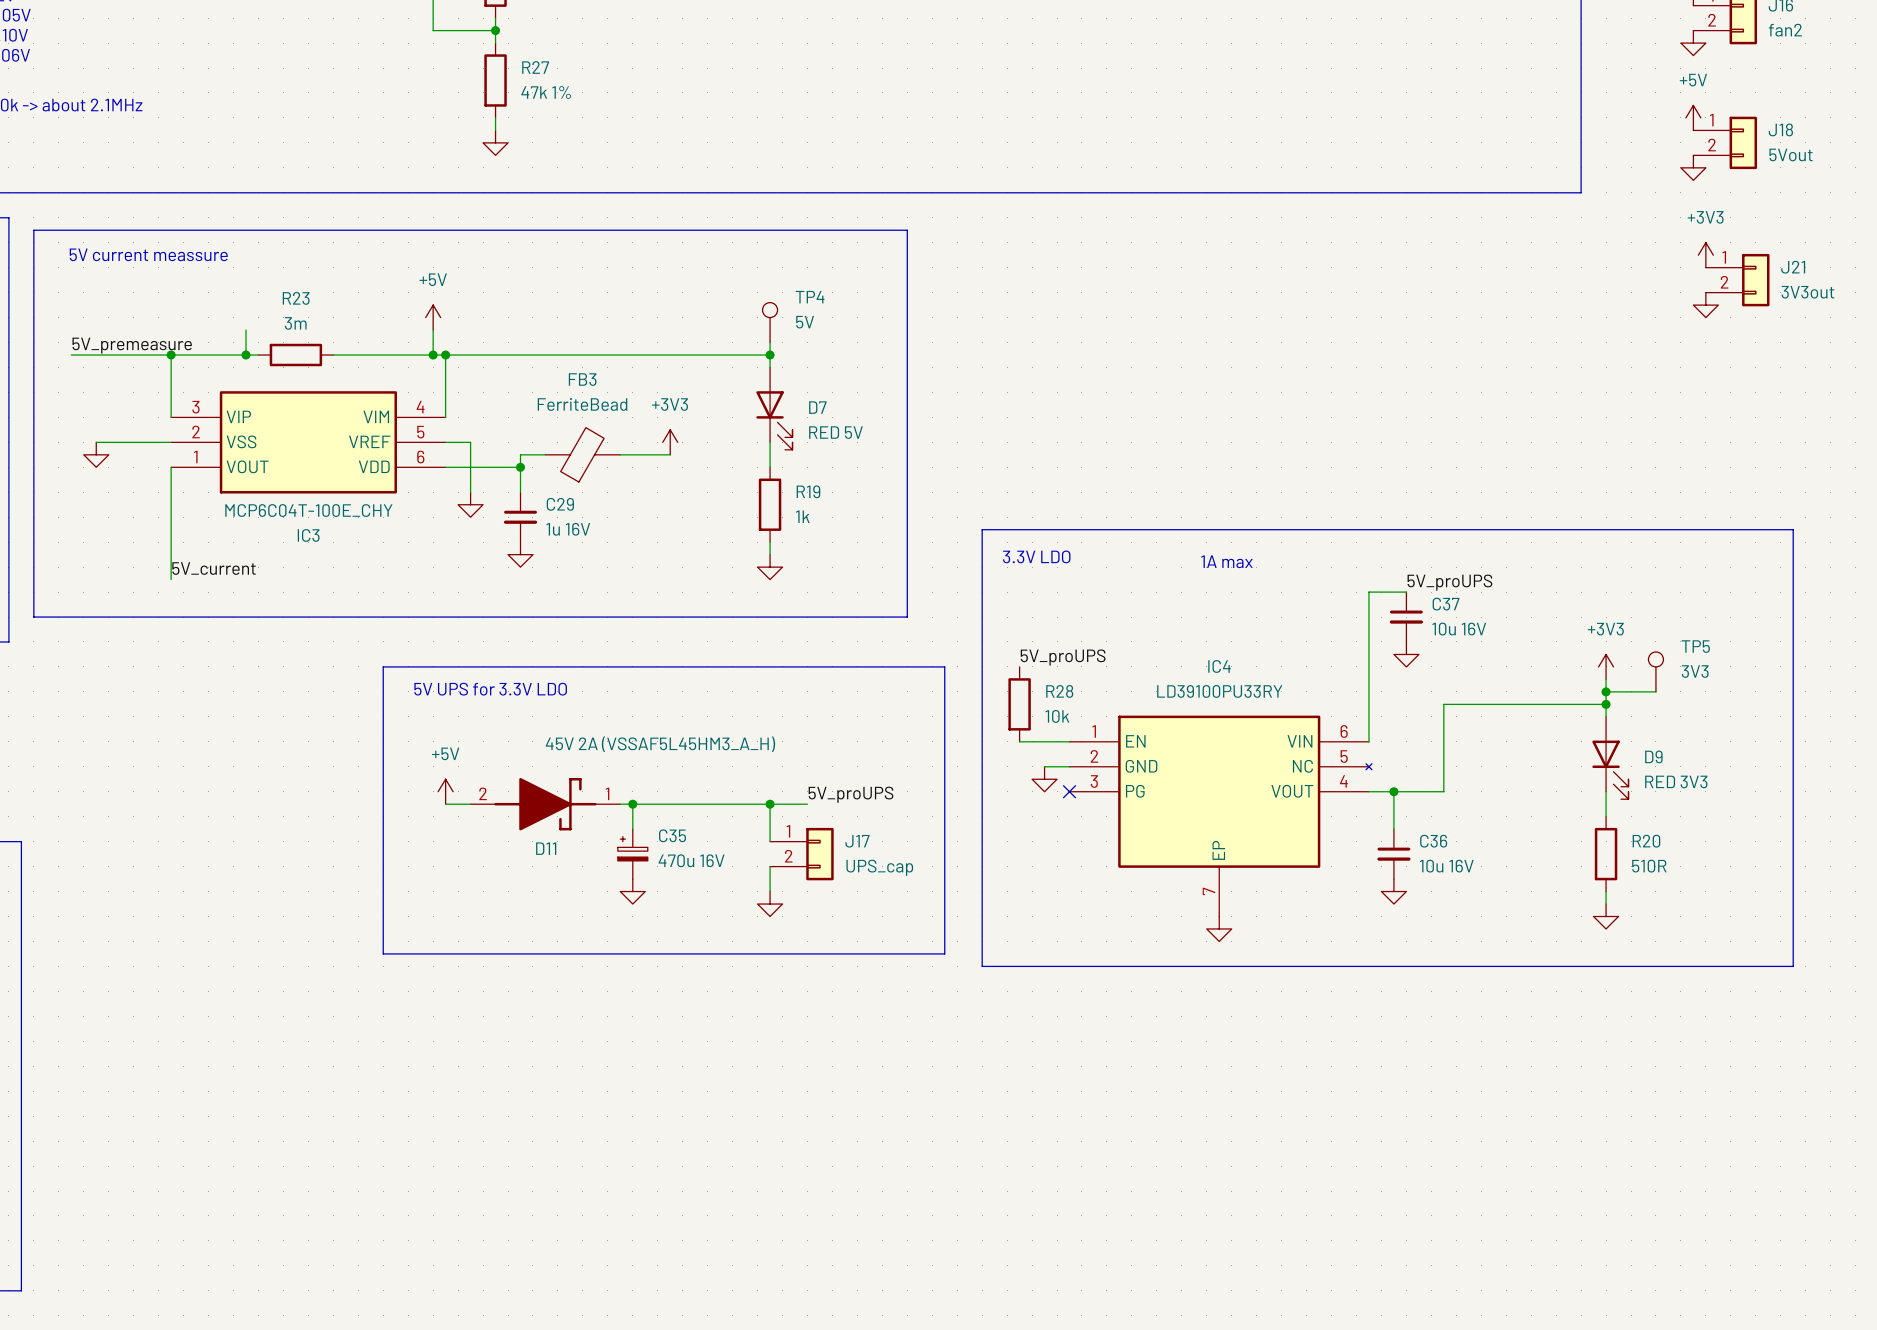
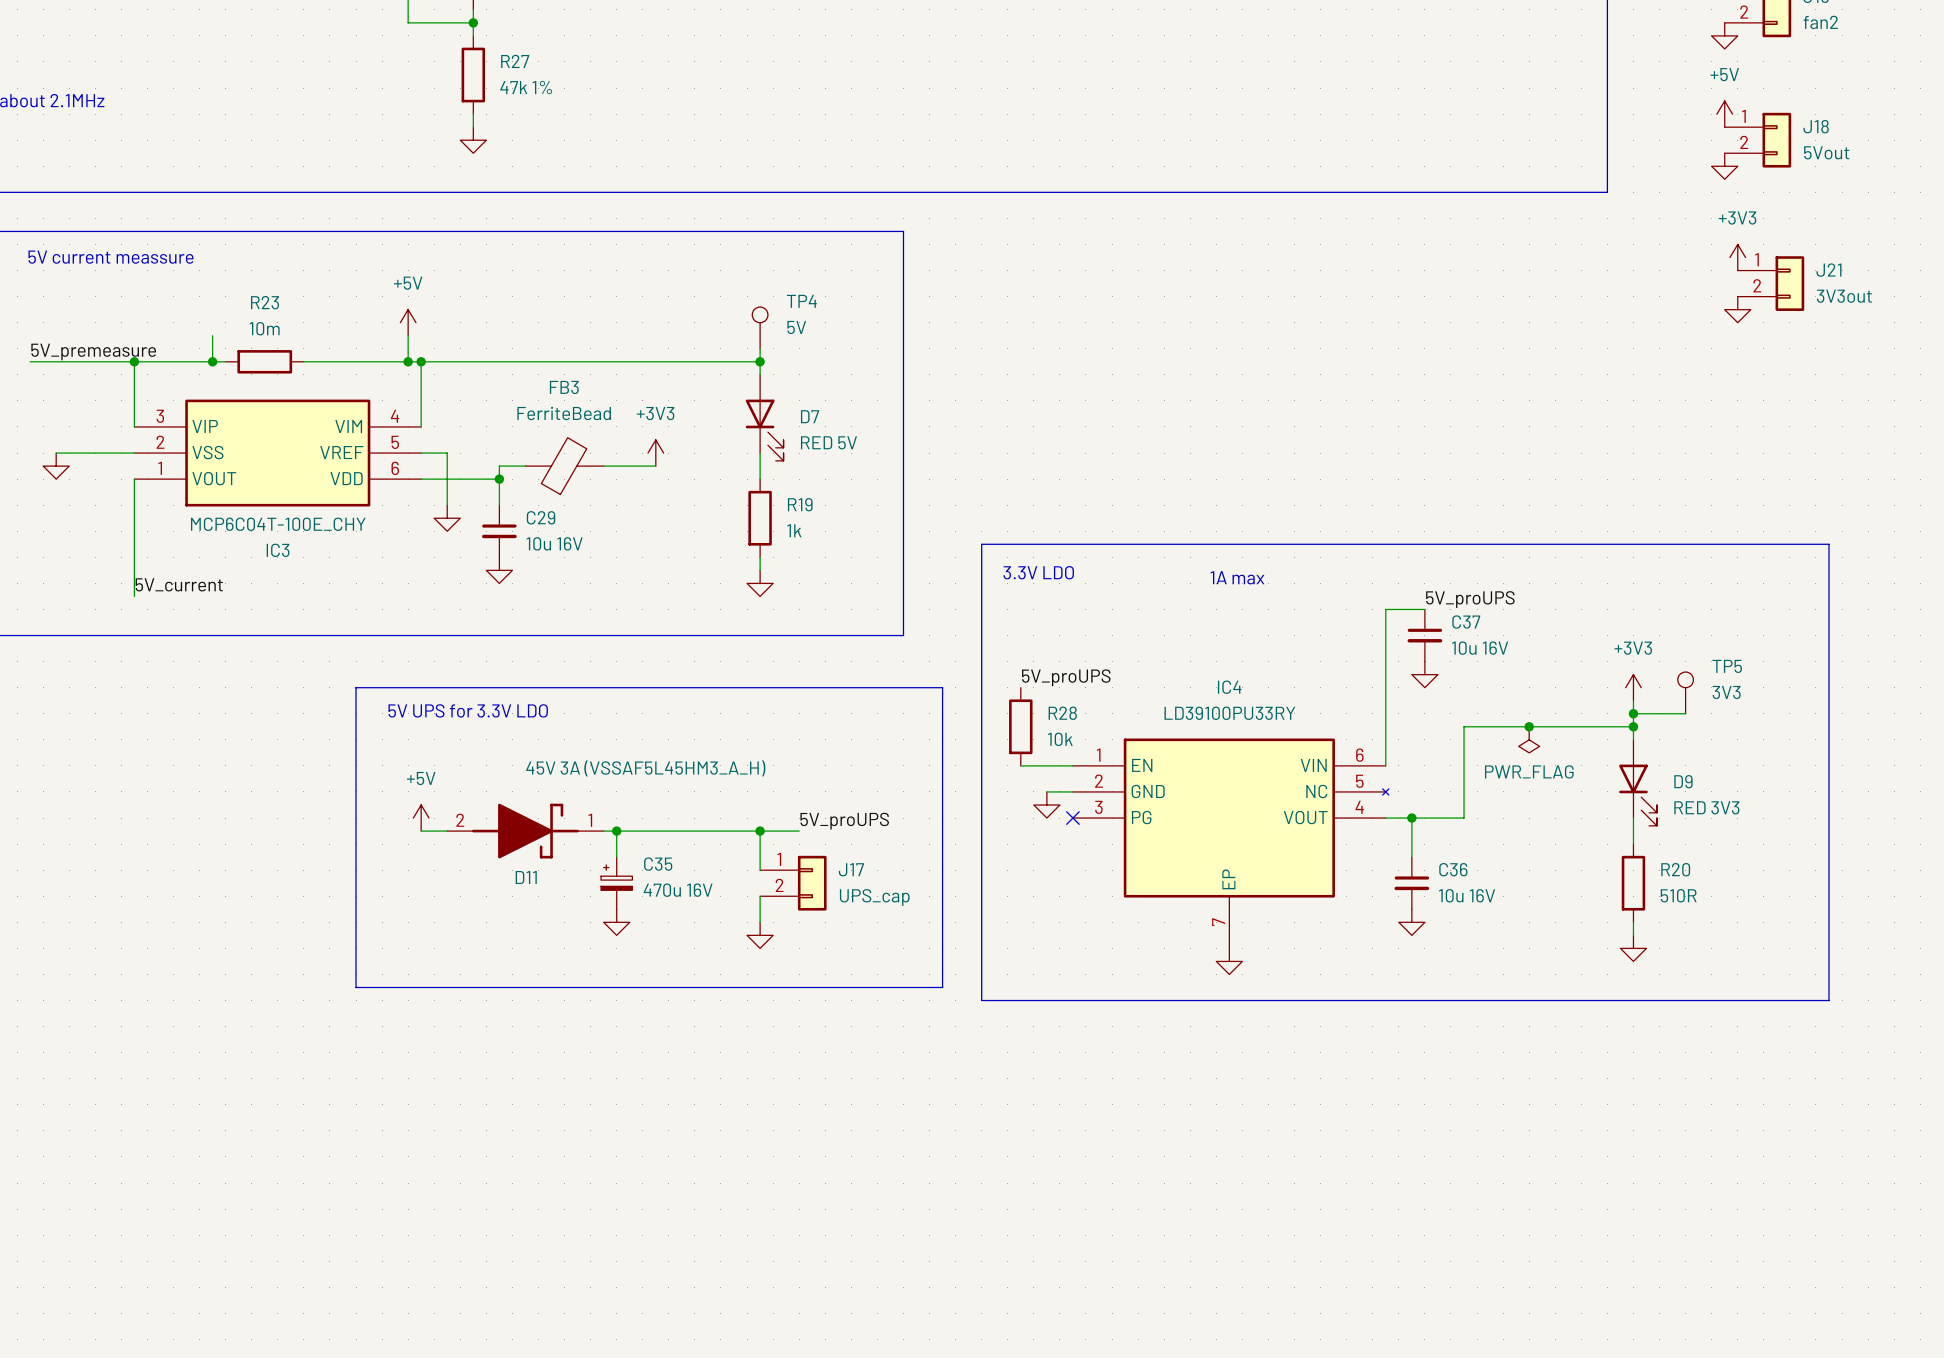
R23 value: 3m (295, 323) -> 10m (264, 328)
C29 value: 1u 16V (568, 529) -> 10u 16V (554, 543)
junction: none -> (1529, 726)
power symbol: none -> PWR_FLAG (1529, 739)
D11 value: 45V 2A (VSSAF5L45HM3_A_H) (660, 744) -> 45V 3A (VSSAF5L45HM3_A_H) (645, 768)

